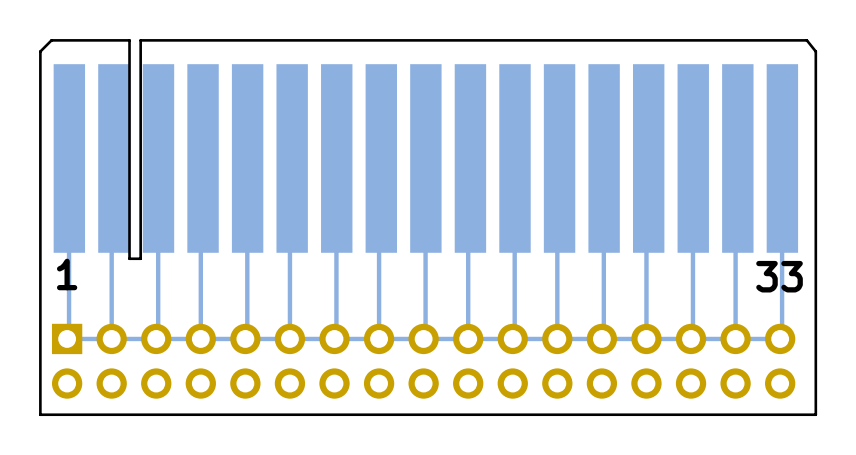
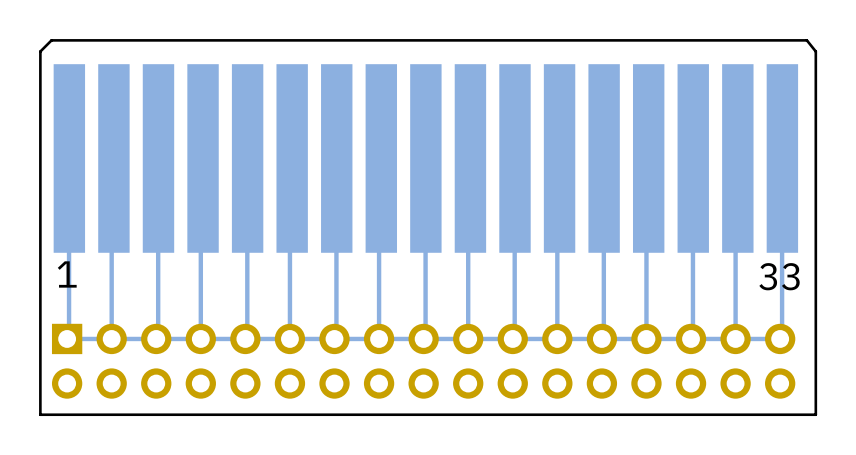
board edge: (140, 40) (140, 258) (129, 258) (129, 40) -> (140, 40) (129, 40)

